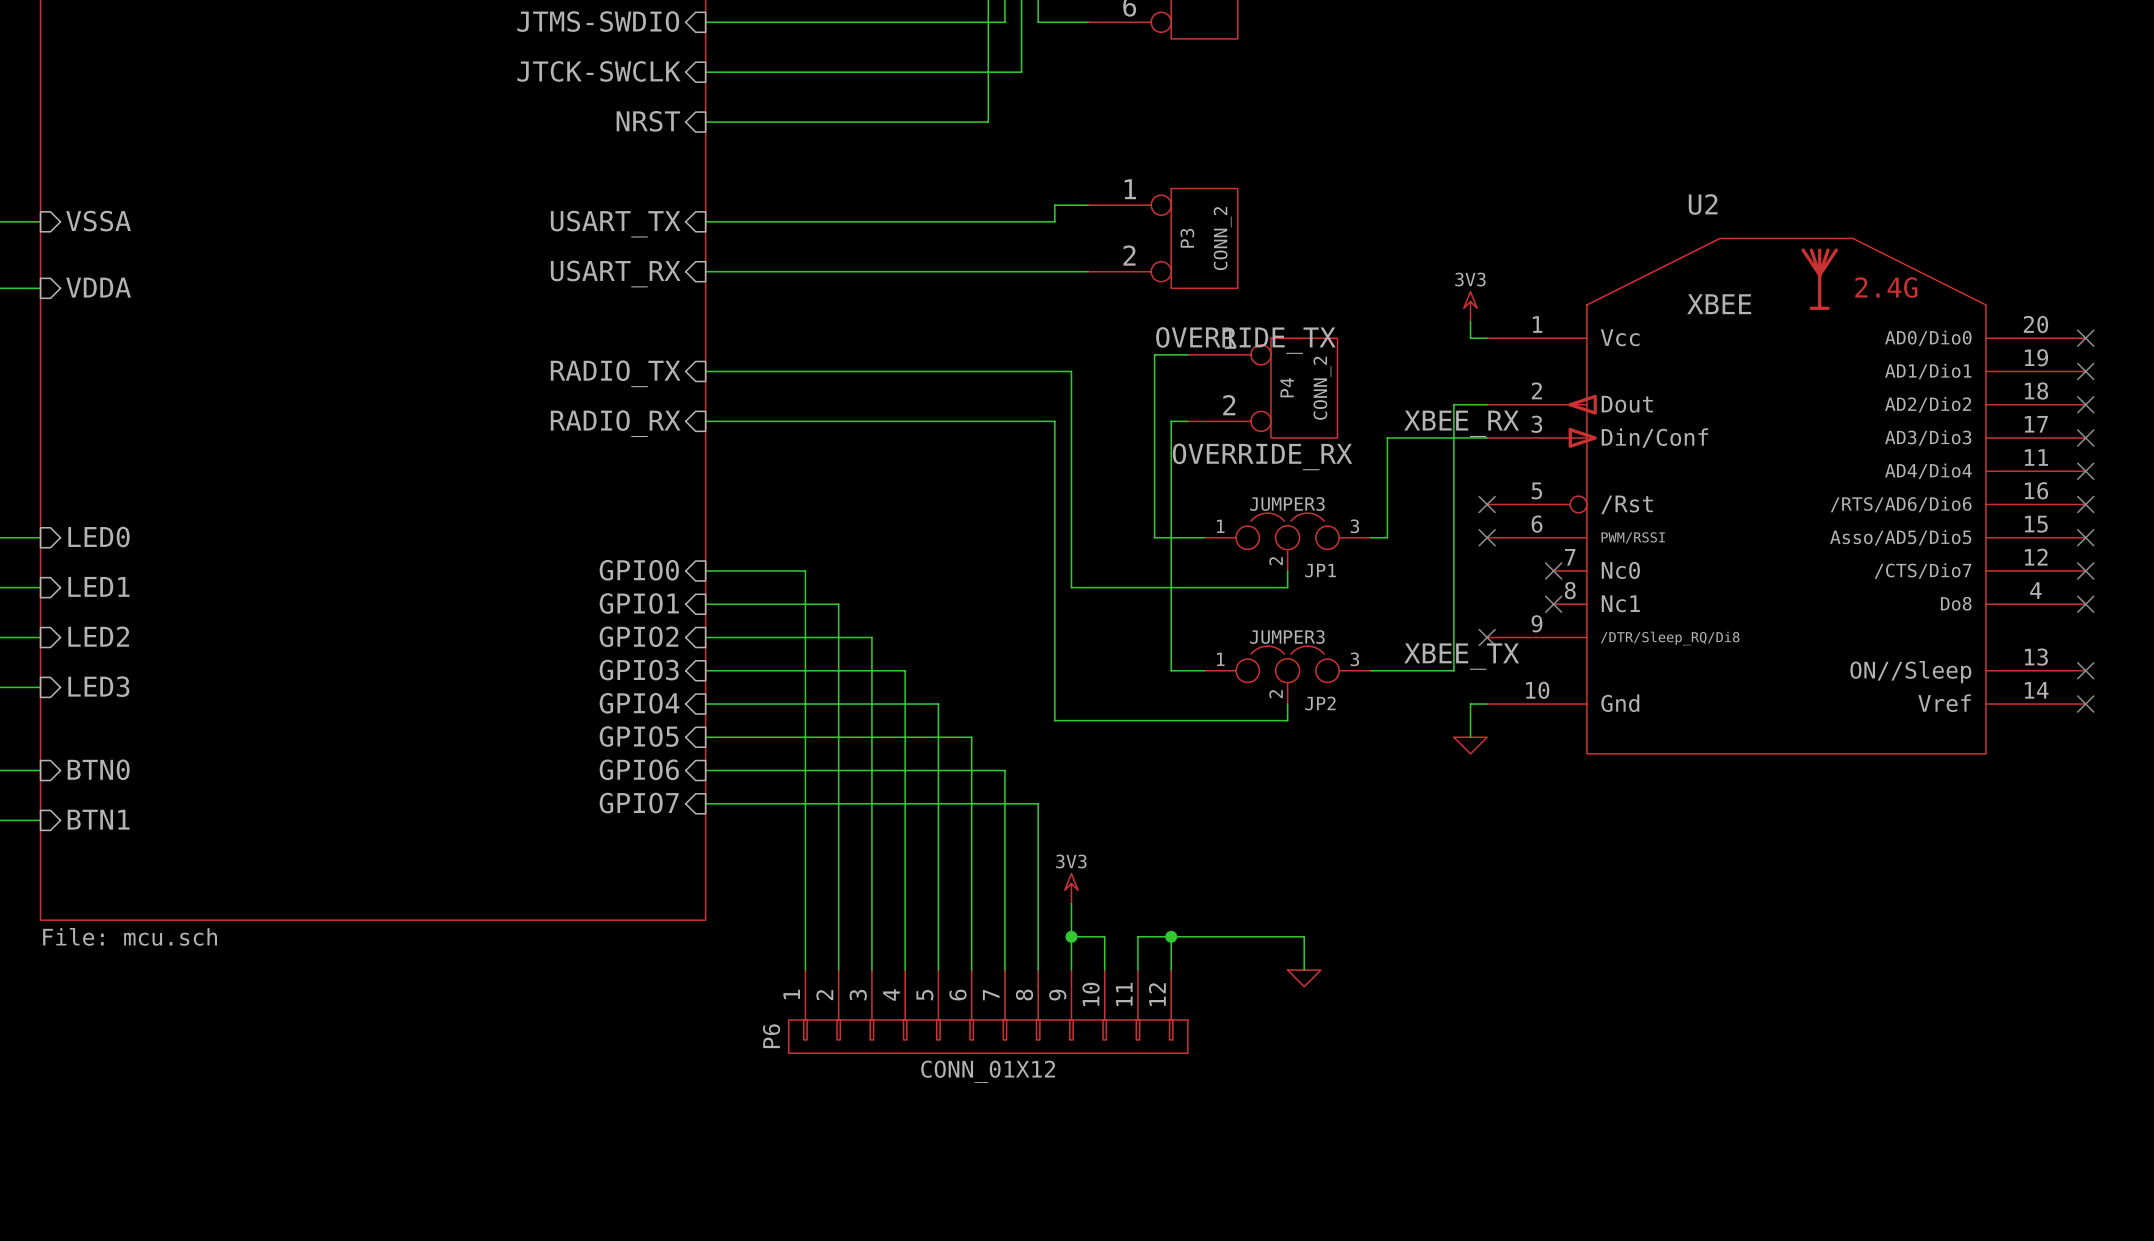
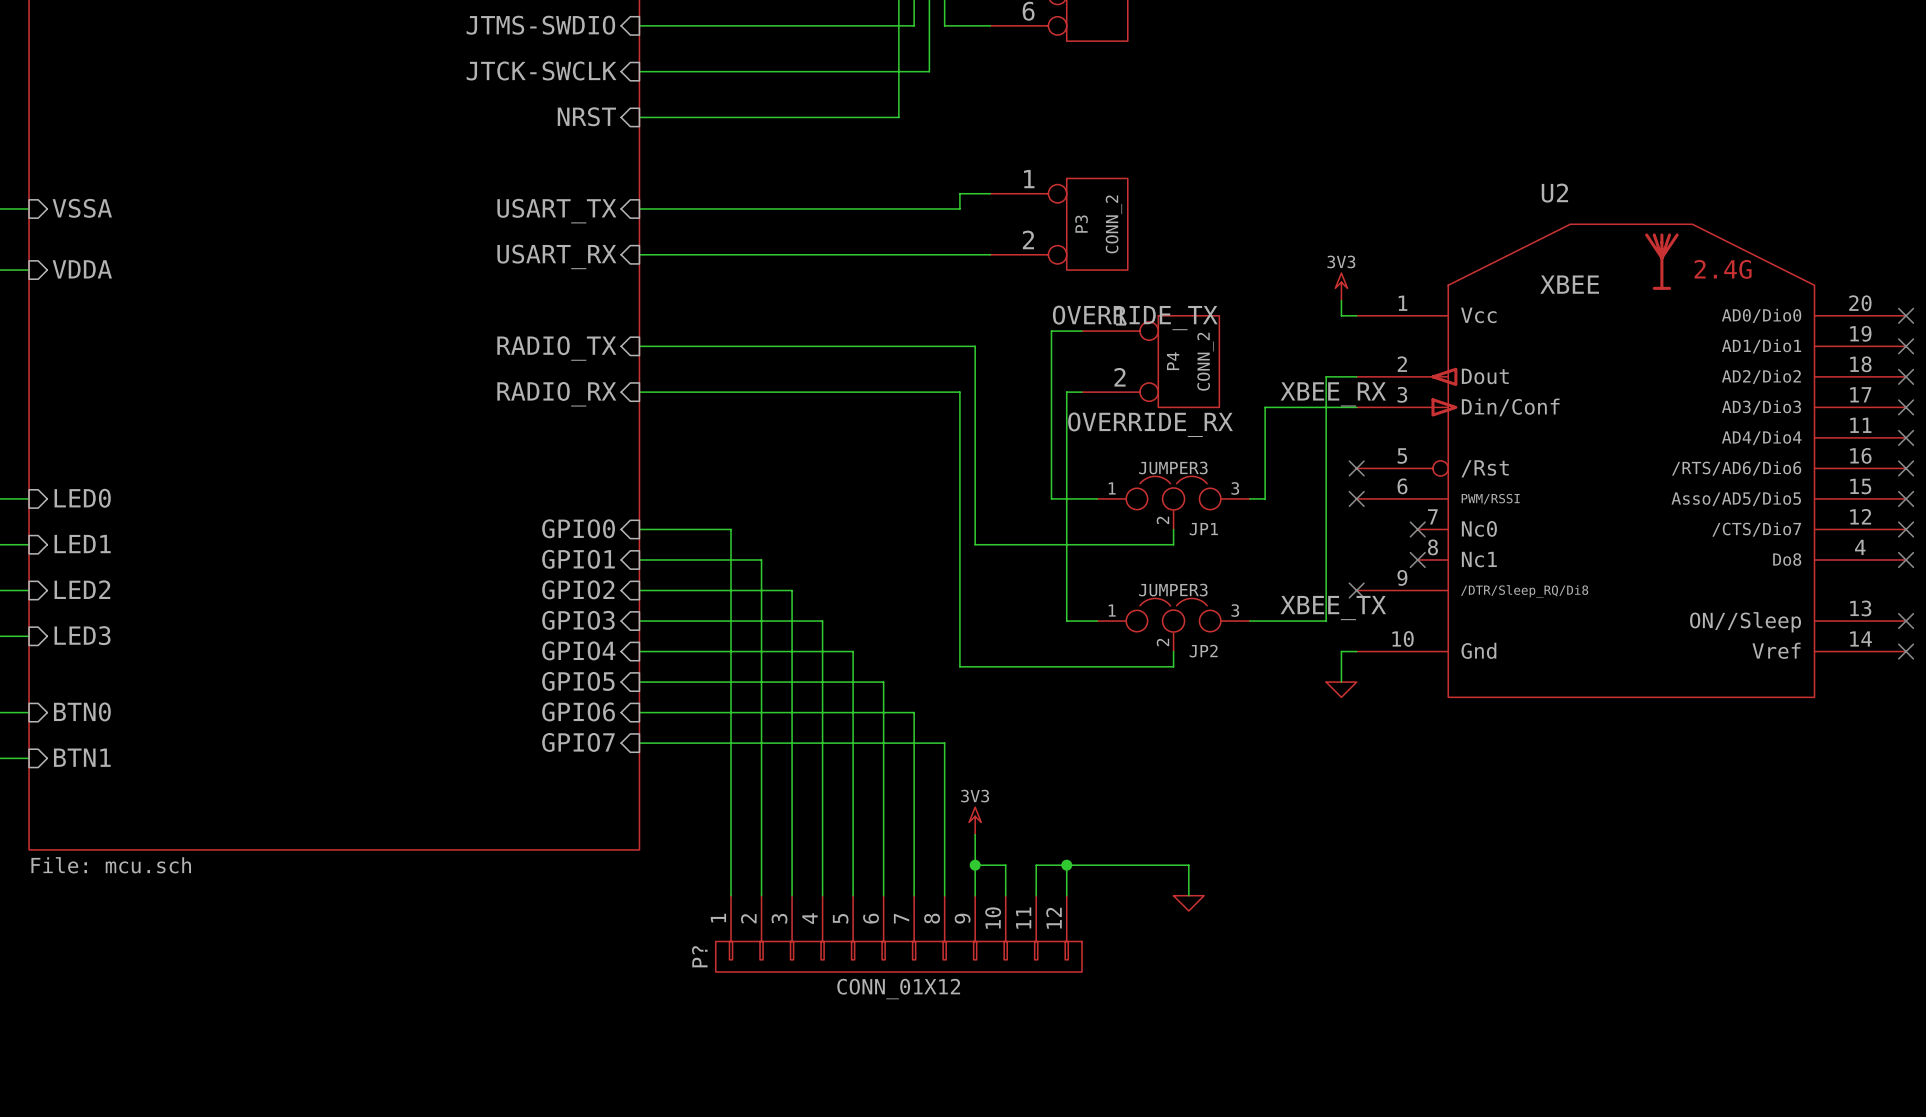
P6 name: P6 (771, 1036) -> P? (699, 956)

